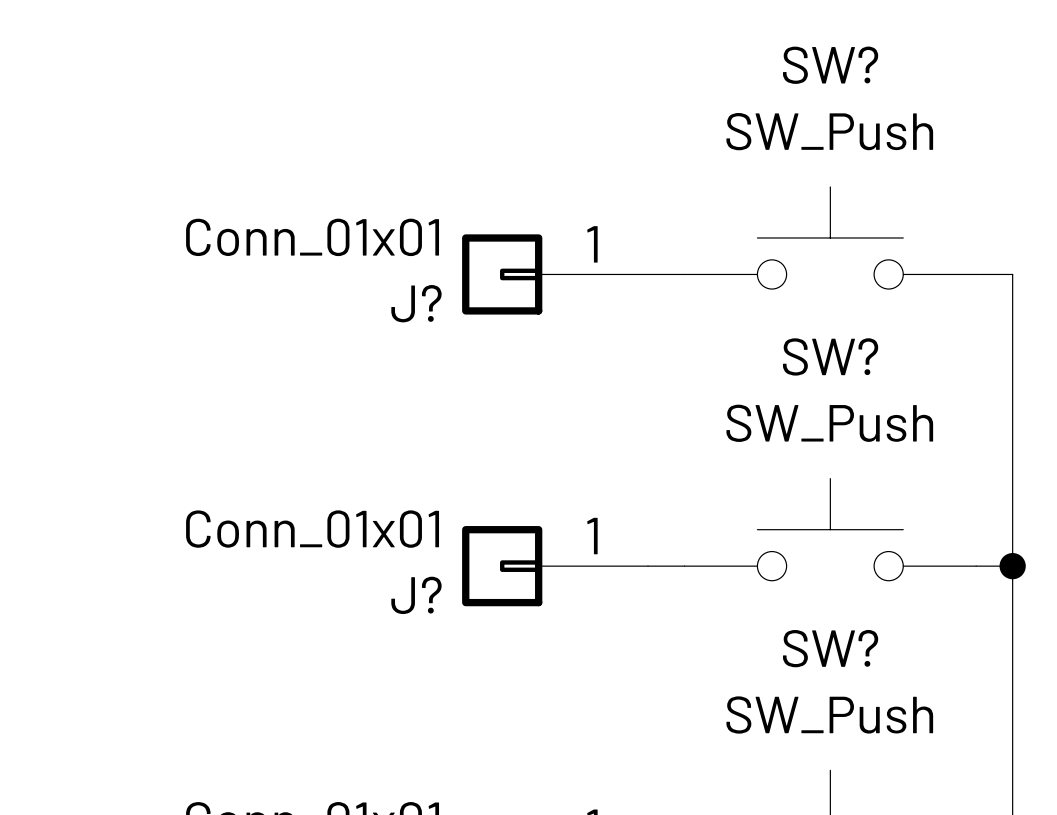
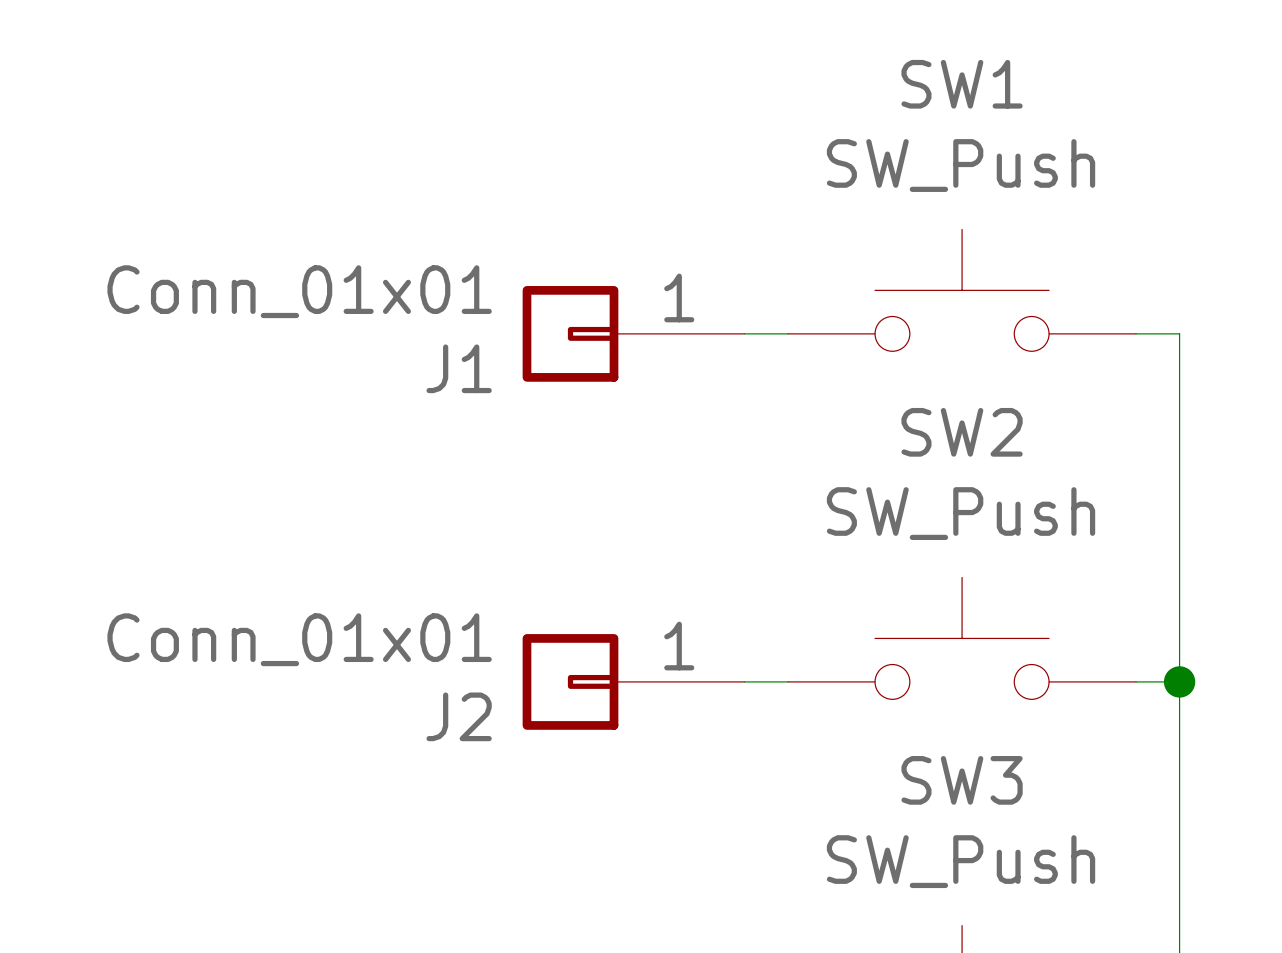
SW? name: SW? (830, 65) -> SW1 (962, 84)
J? name: J? (416, 303) -> J1 (459, 368)
SW? name: SW? (830, 356) -> SW2 (962, 432)
J? name: J? (416, 595) -> J2 (459, 716)
SW? name: SW? (830, 648) -> SW3 (962, 780)

